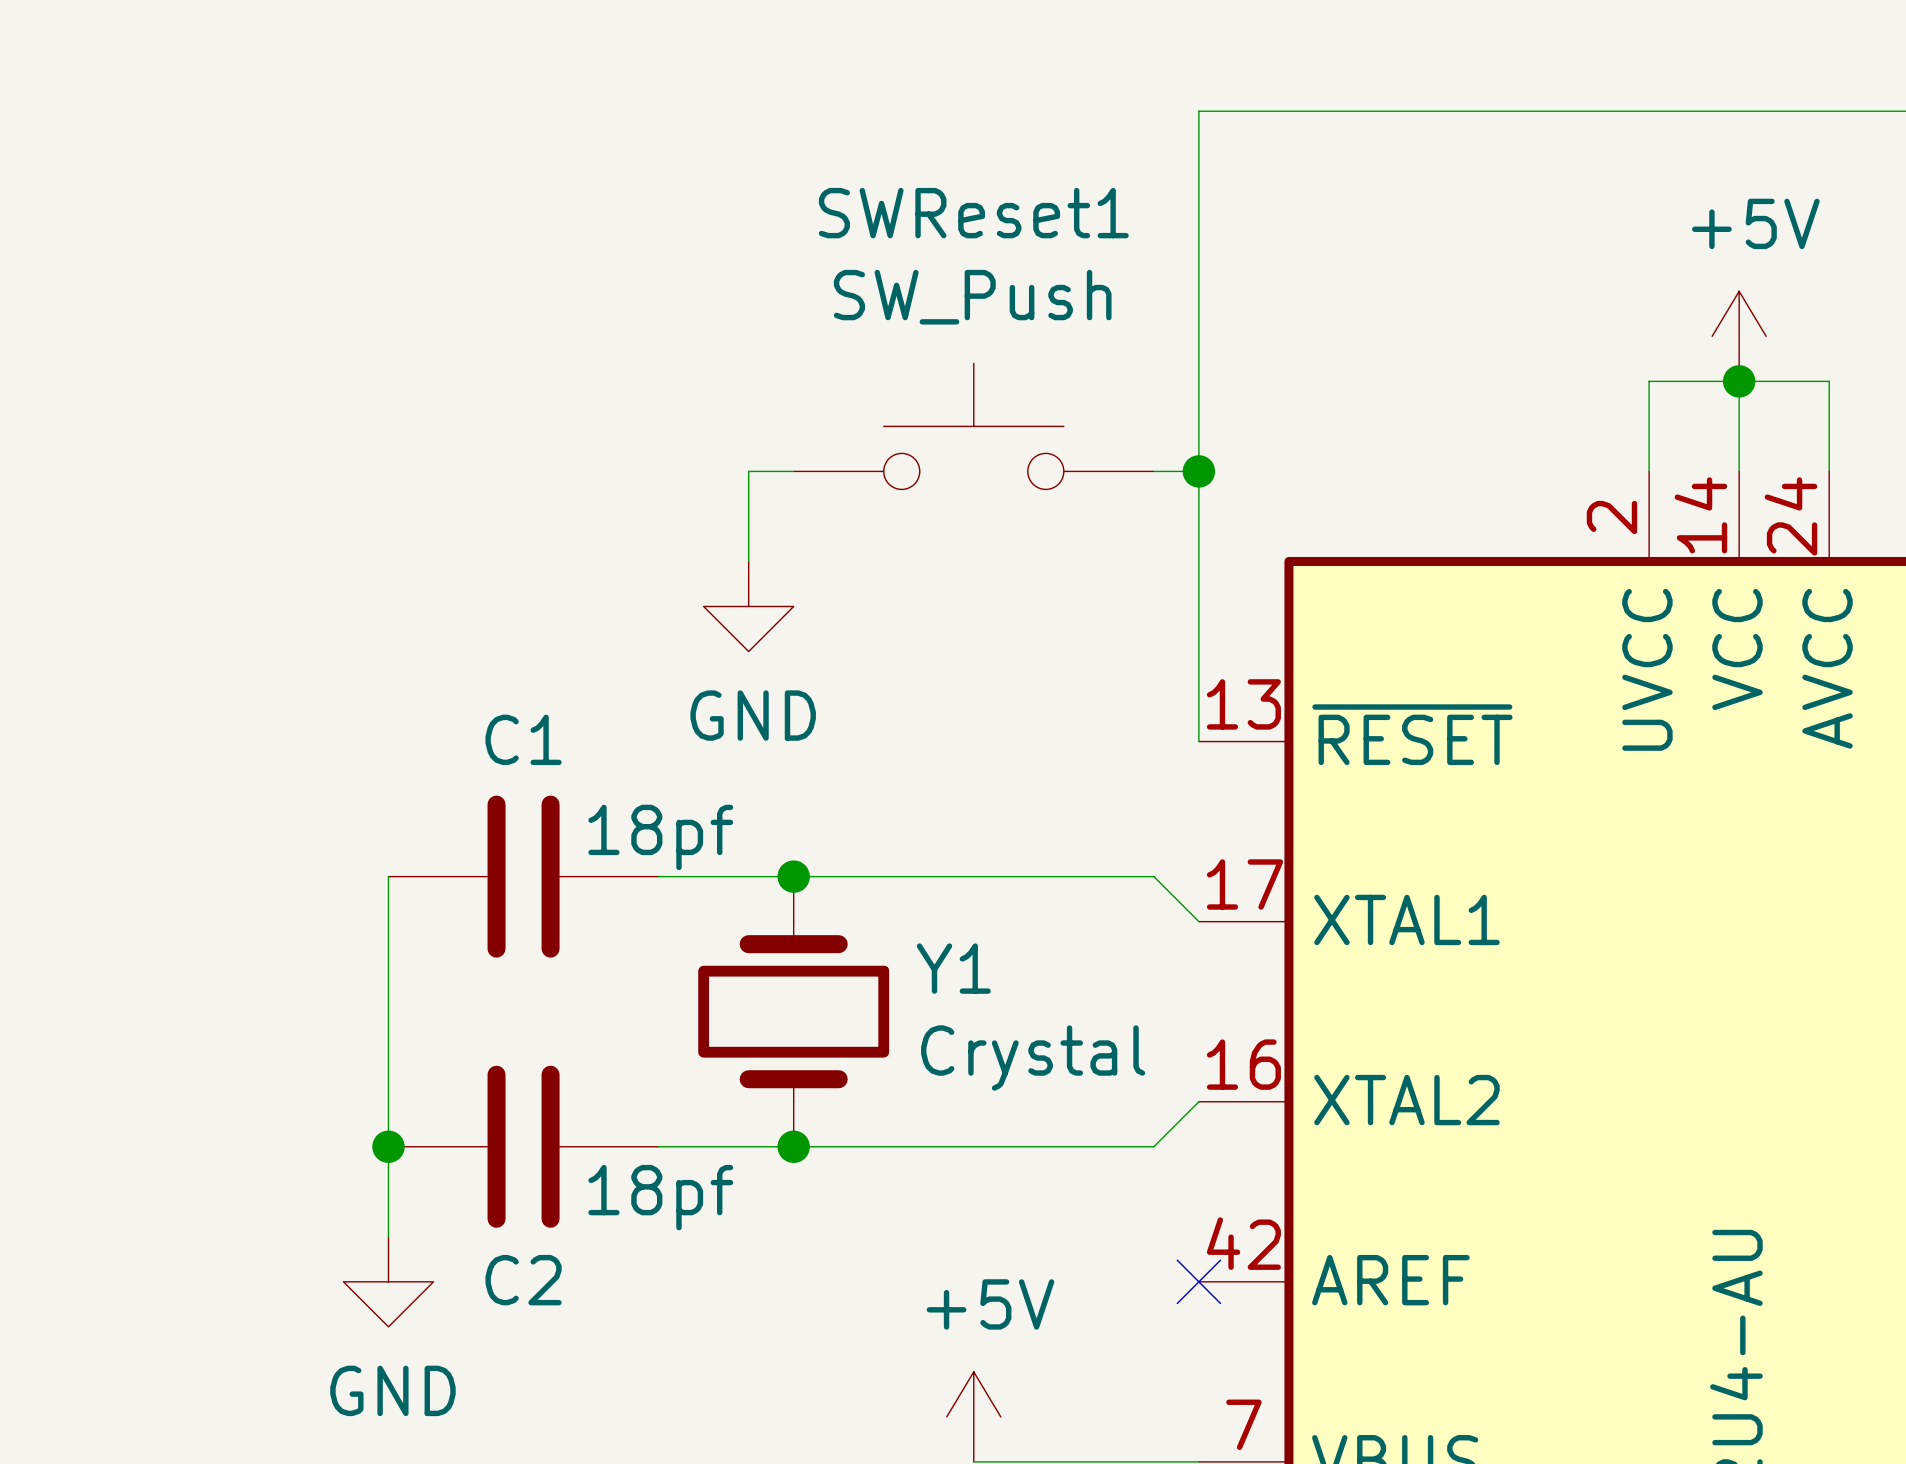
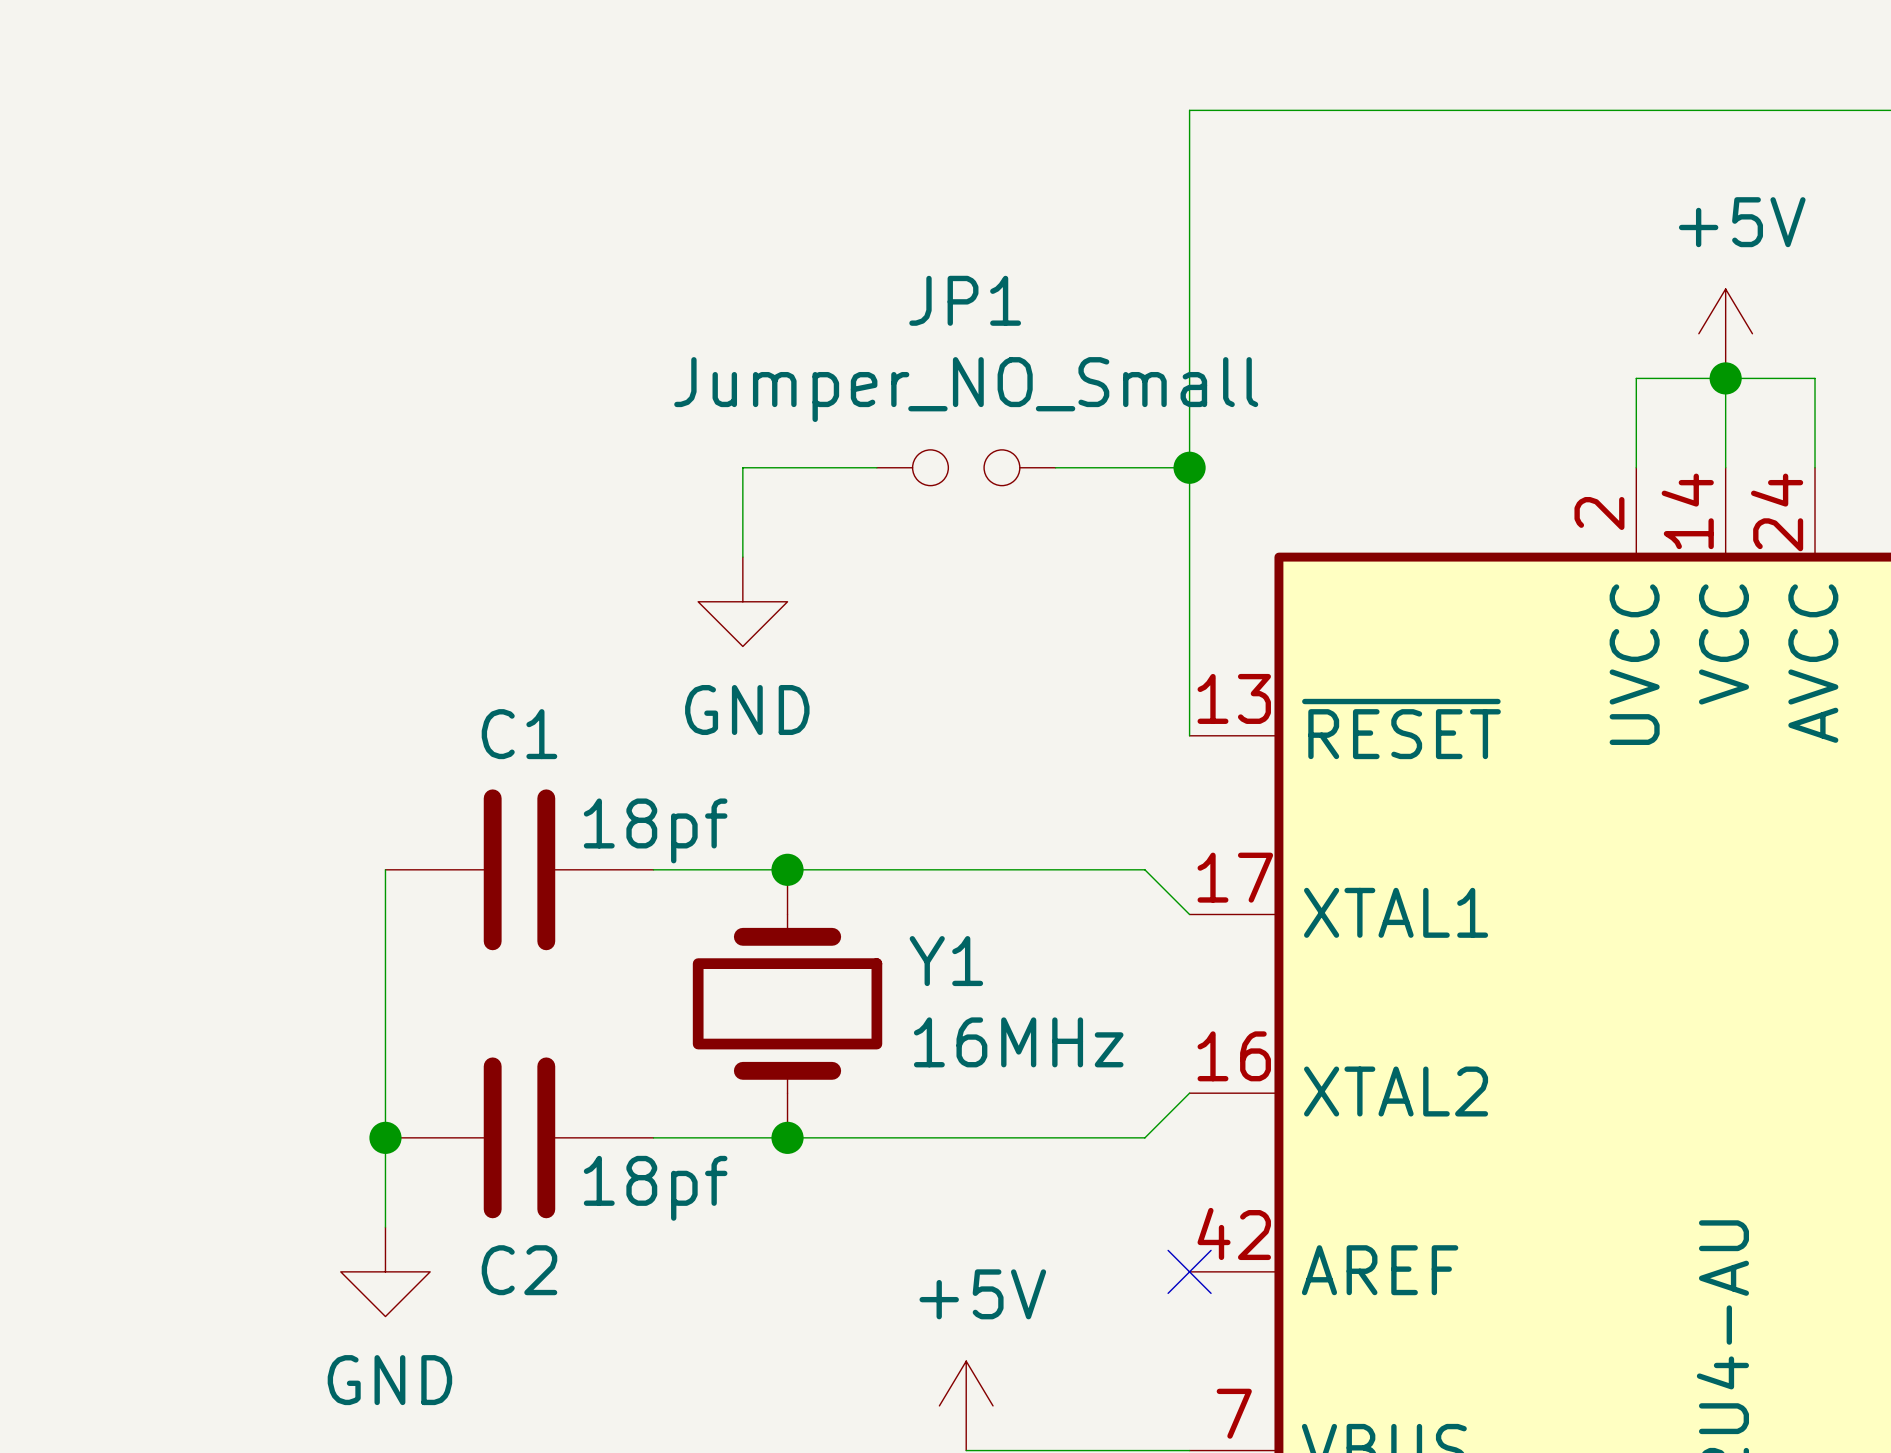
SWReset1: SW_Push (973, 426) -> none
JP1: none -> Jumper_NO_Small (966, 467)
Y1 value: Crystal (1033, 1058) -> 16MHz (1018, 1042)

